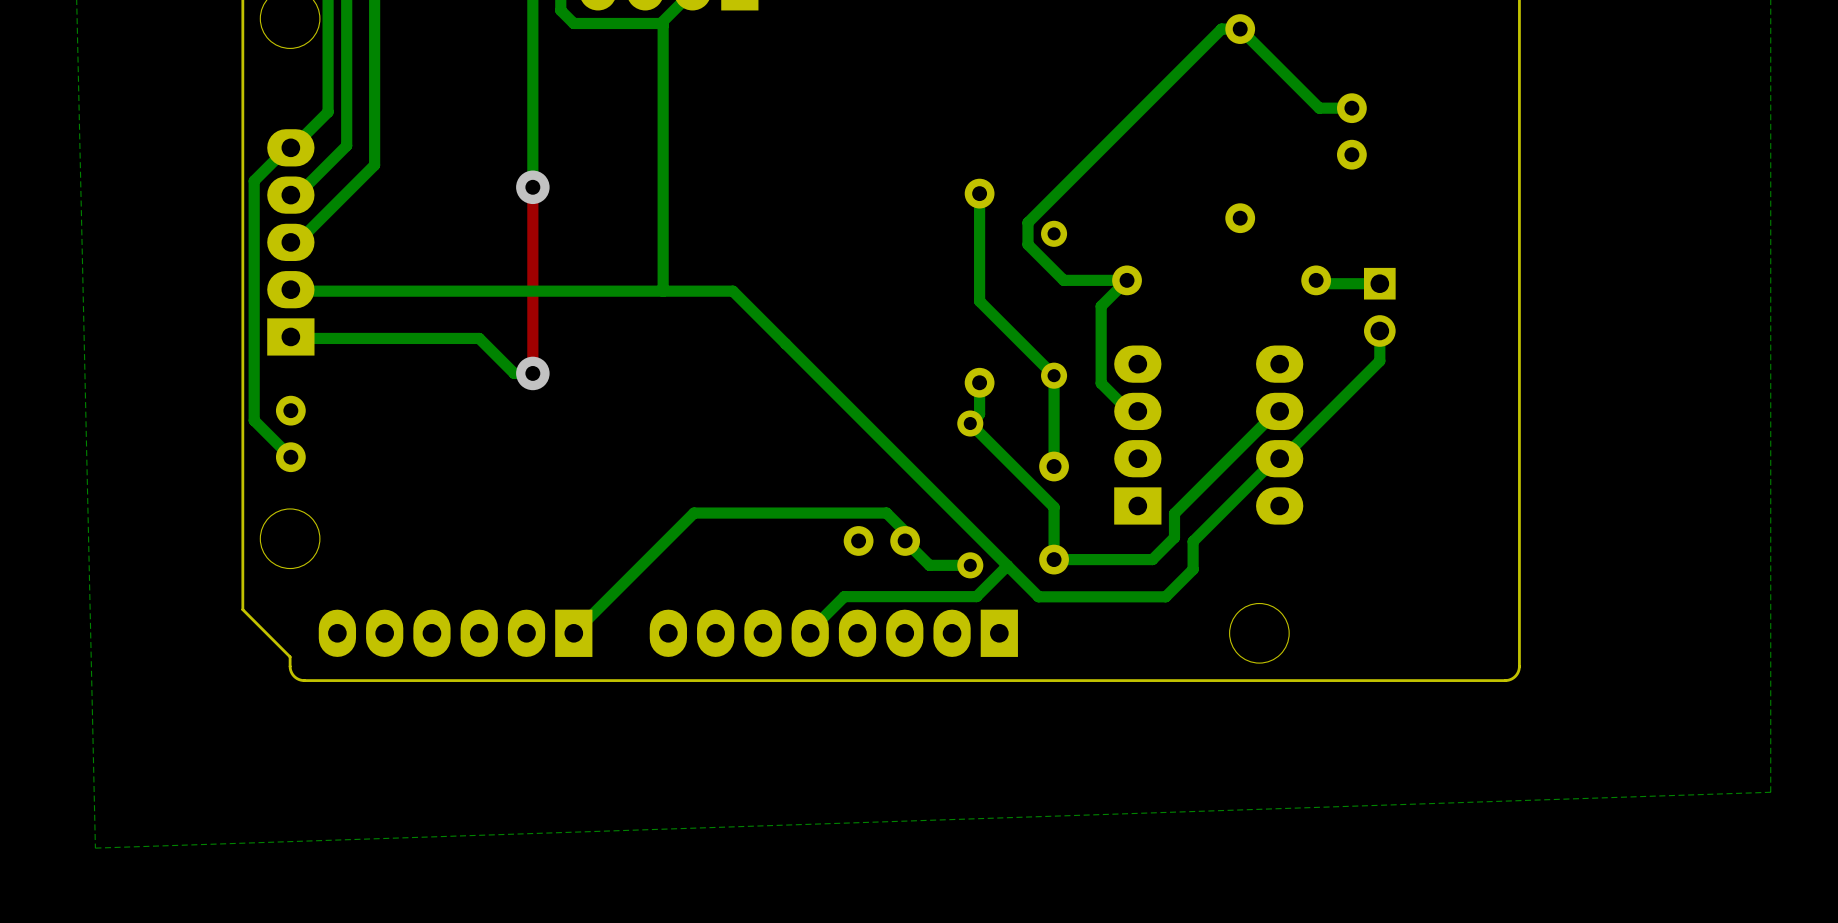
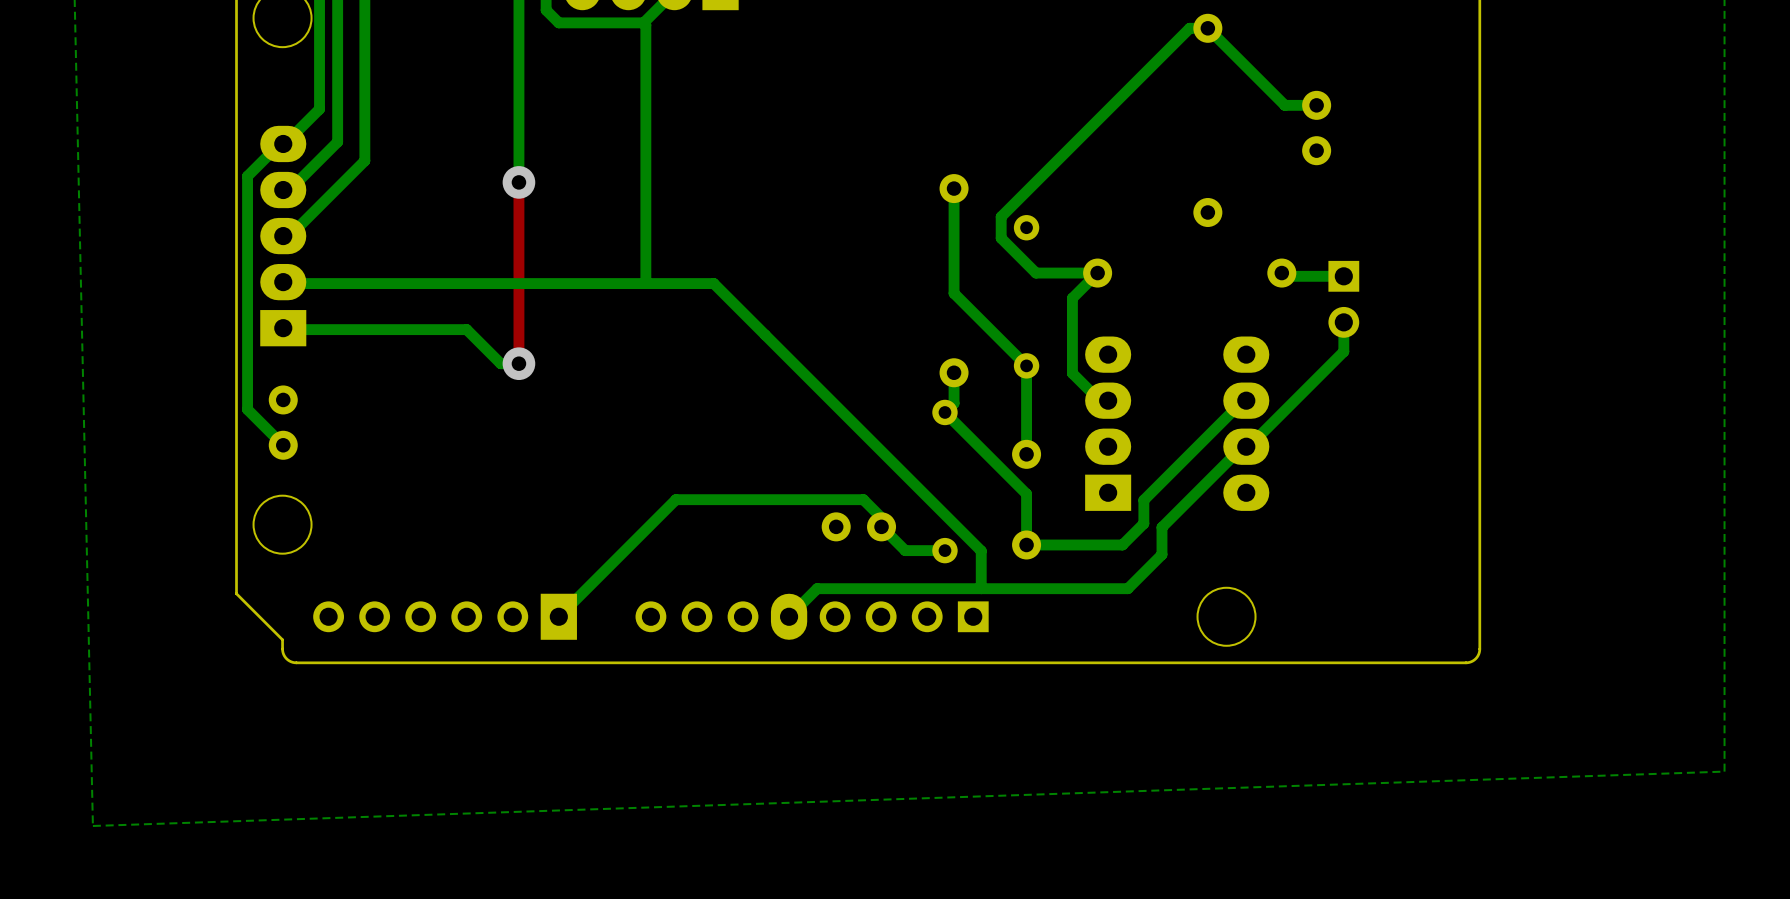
bottom track: none -> (981, 550) (981, 588)
bottom track: (1165, 596) (1038, 596) (1007, 565) (976, 596) (844, 596) (810, 630) (810, 633) -> (1135, 581) (1127, 588) (817, 588) (789, 616)
part footprint: [318, 609, 593, 657] -> [313, 593, 577, 640]
part footprint: [649, 609, 1018, 657] -> [635, 593, 989, 640]

